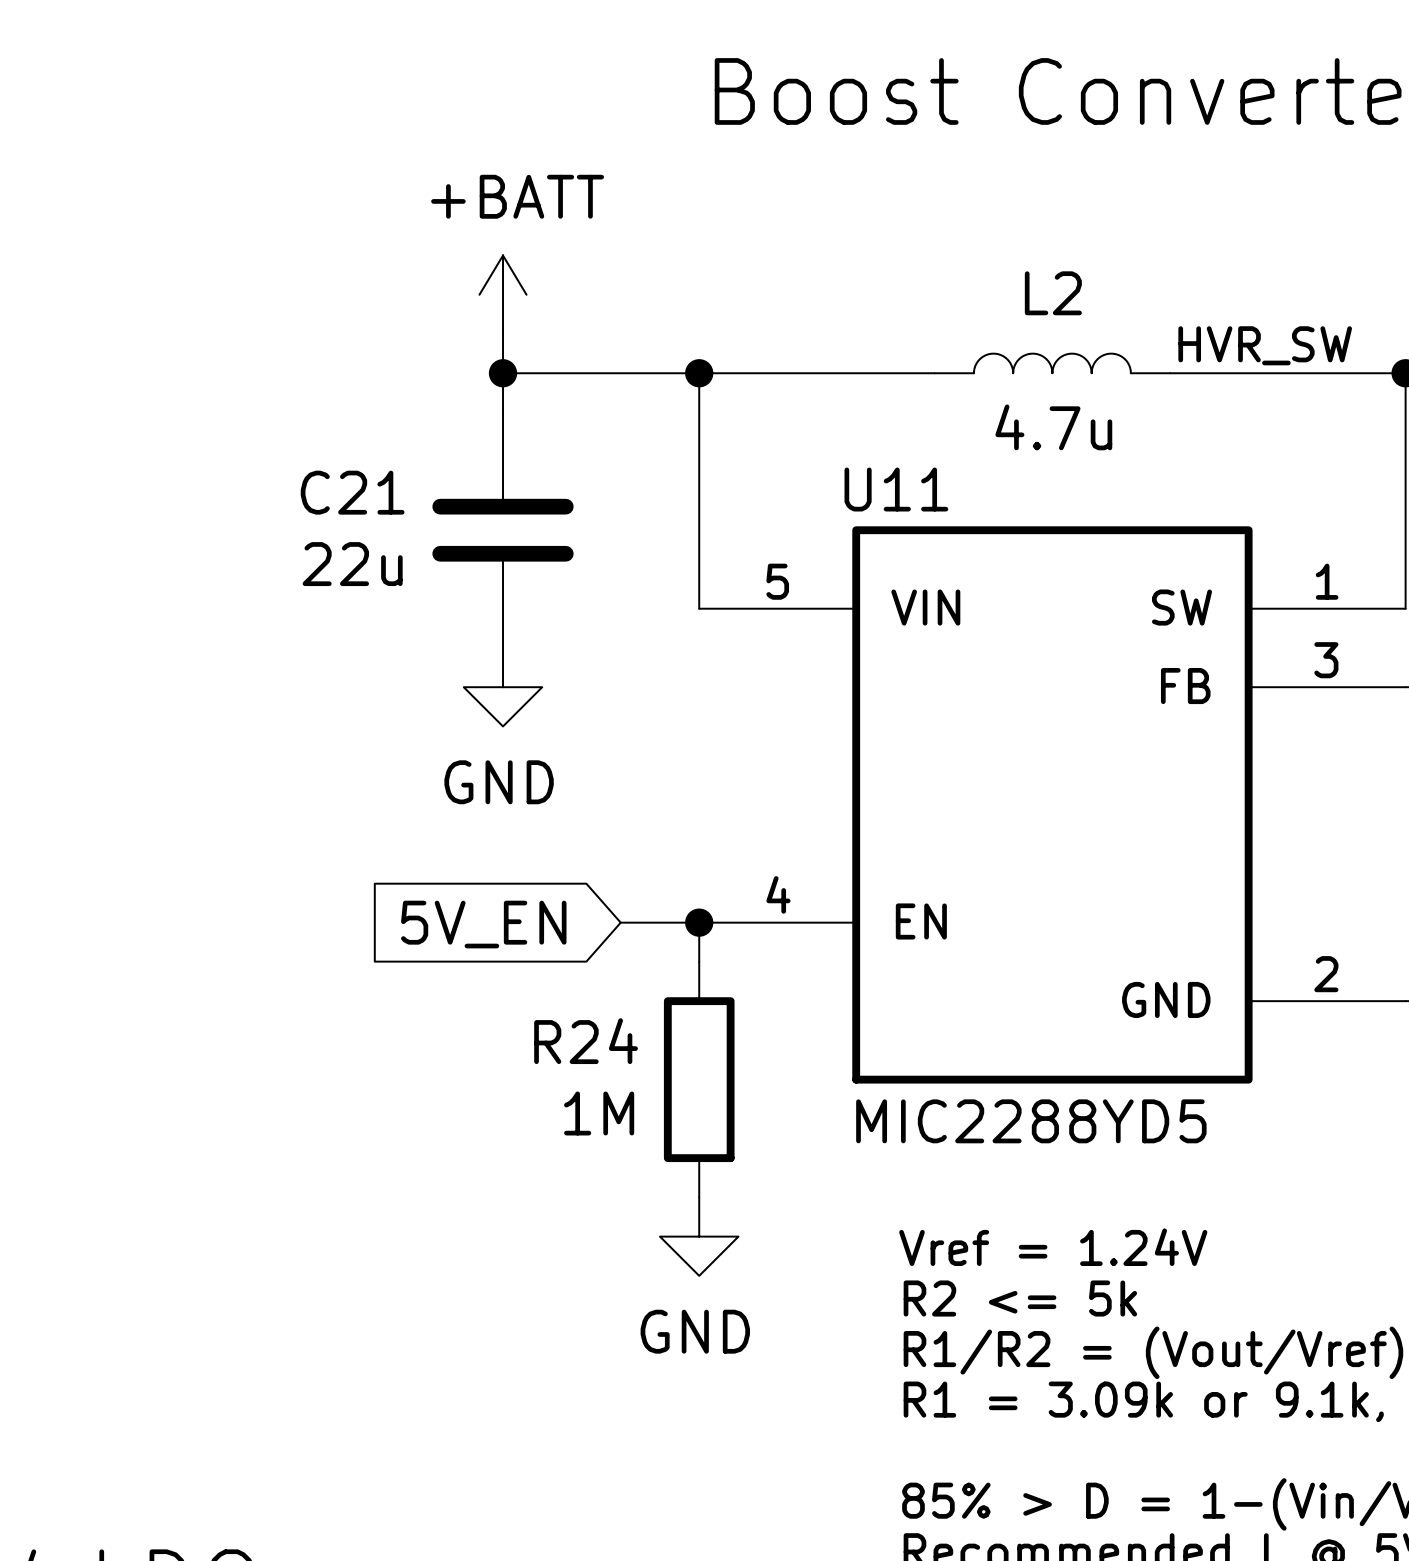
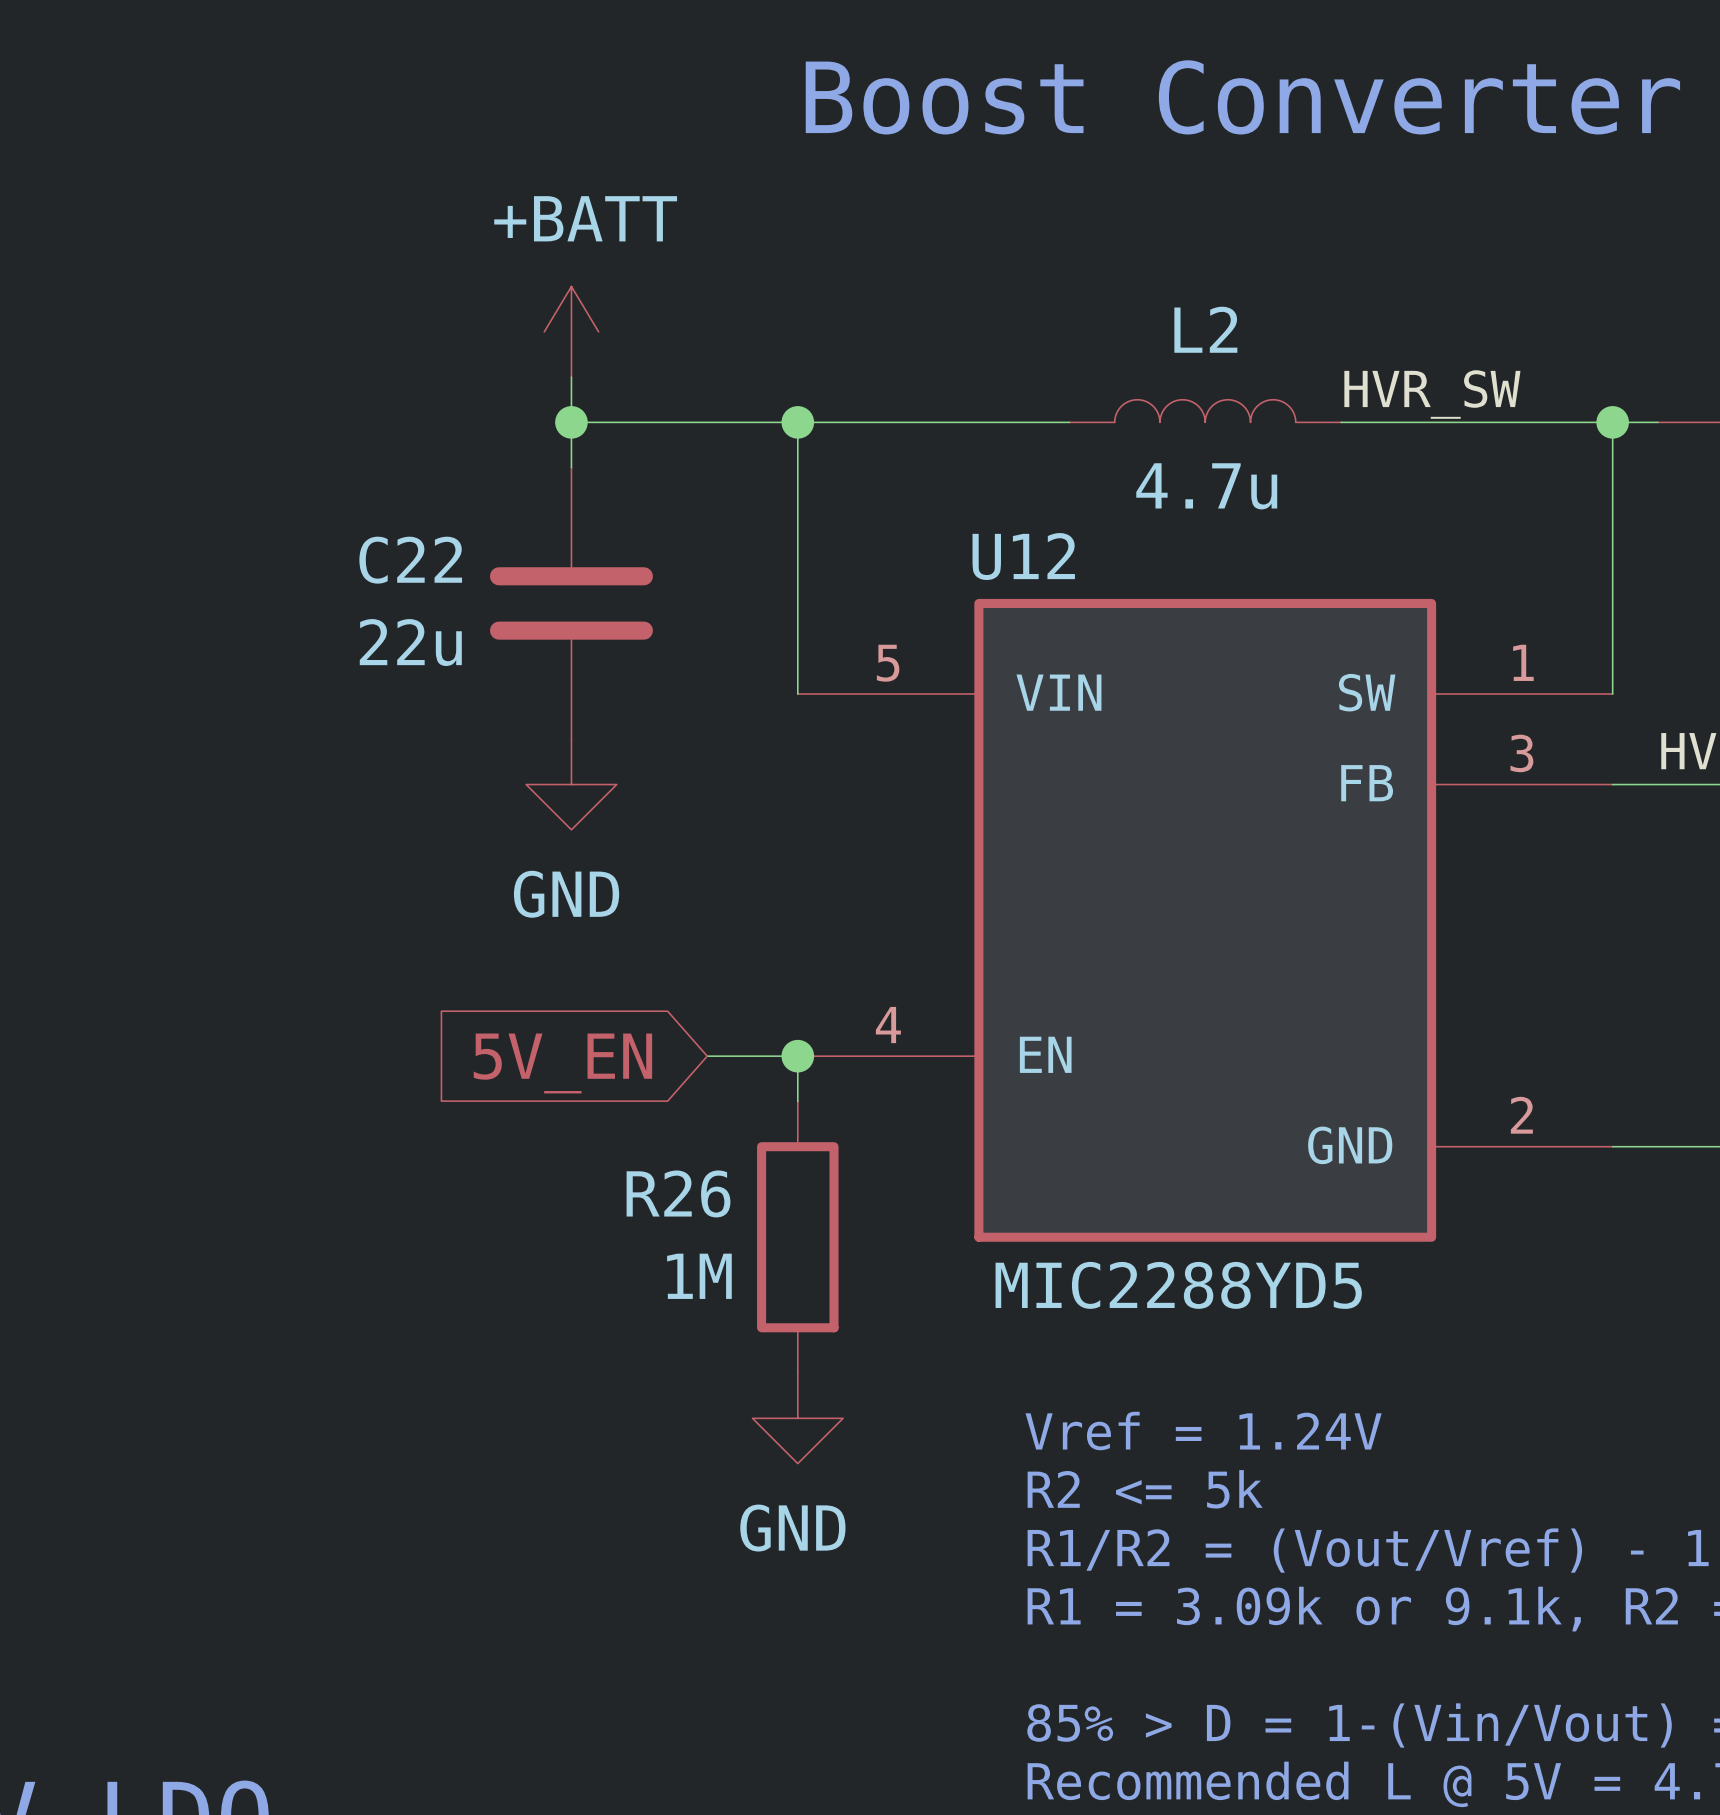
U11 name: U11 (896, 489) -> U12 (1023, 556)
C21 name: C21 (352, 492) -> C22 (410, 560)
R24 name: R24 (586, 1041) -> R26 (678, 1193)

